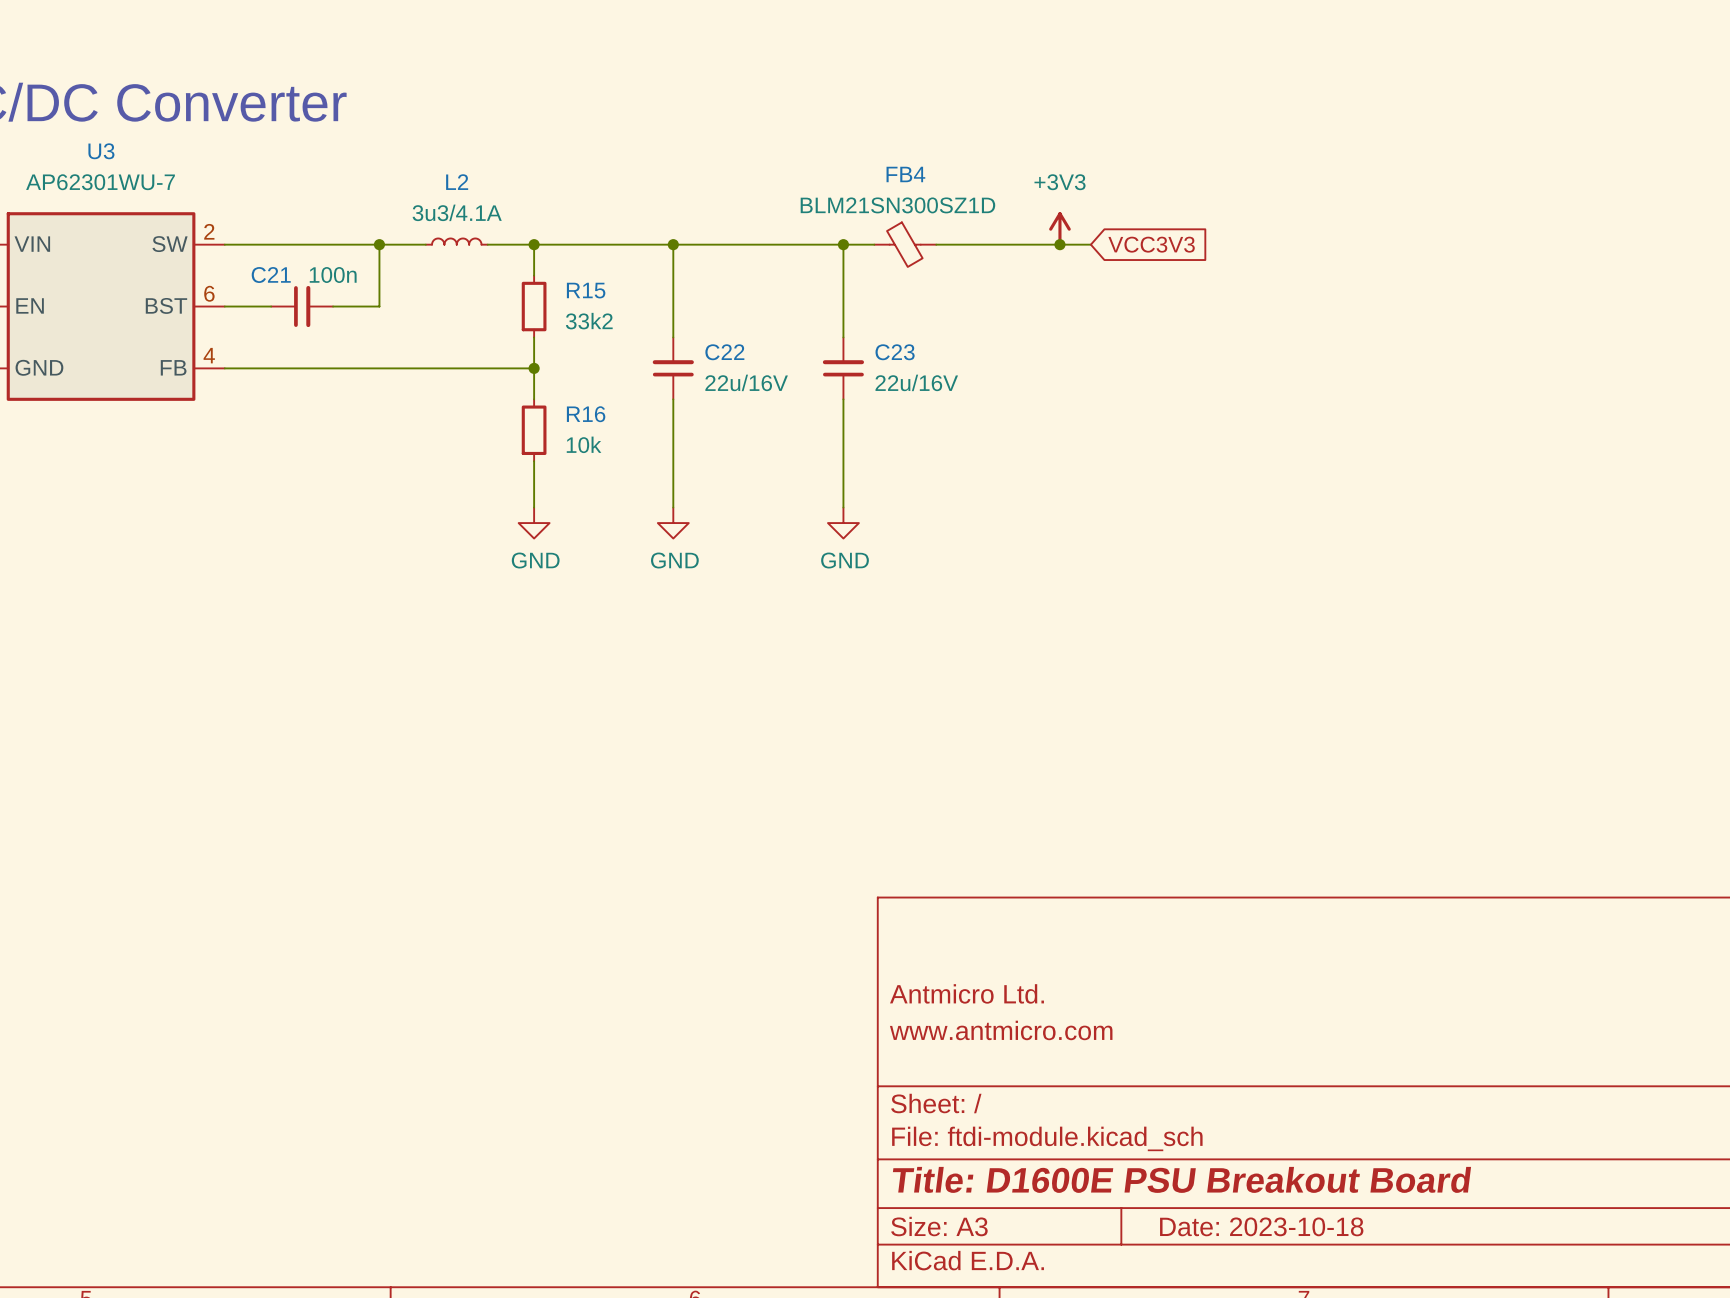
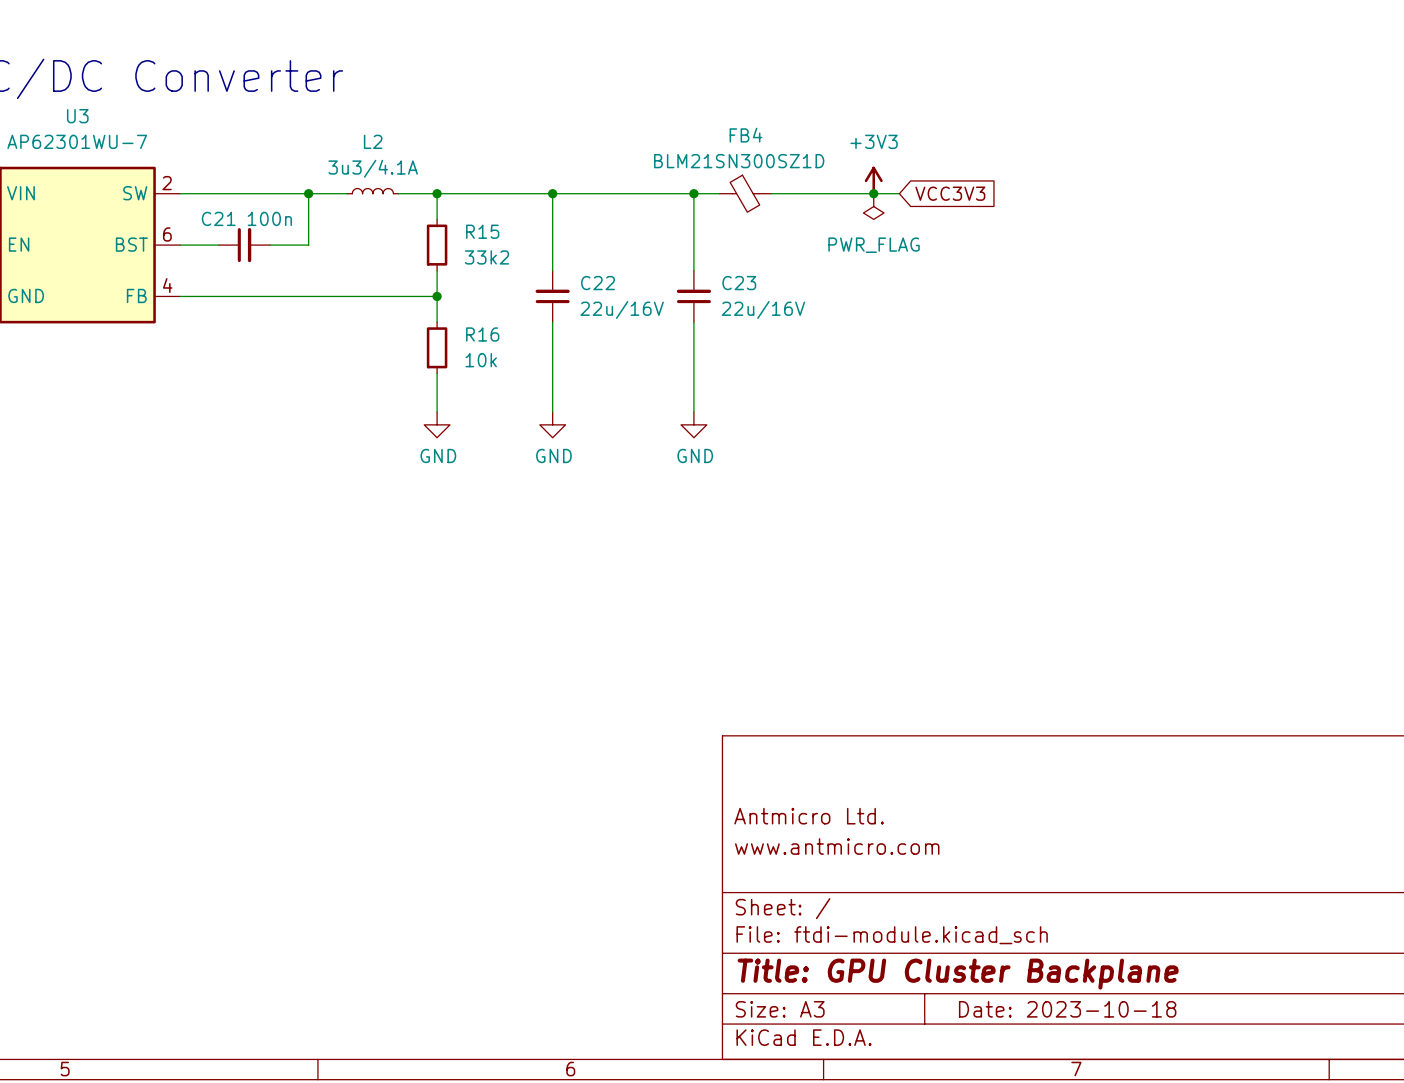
power symbol: none -> PWR_FLAG (873, 206)
title block: Title: D1600E PSU Breakout Board (1181, 1179) -> Title: GPU Cluster Backplane (958, 974)

